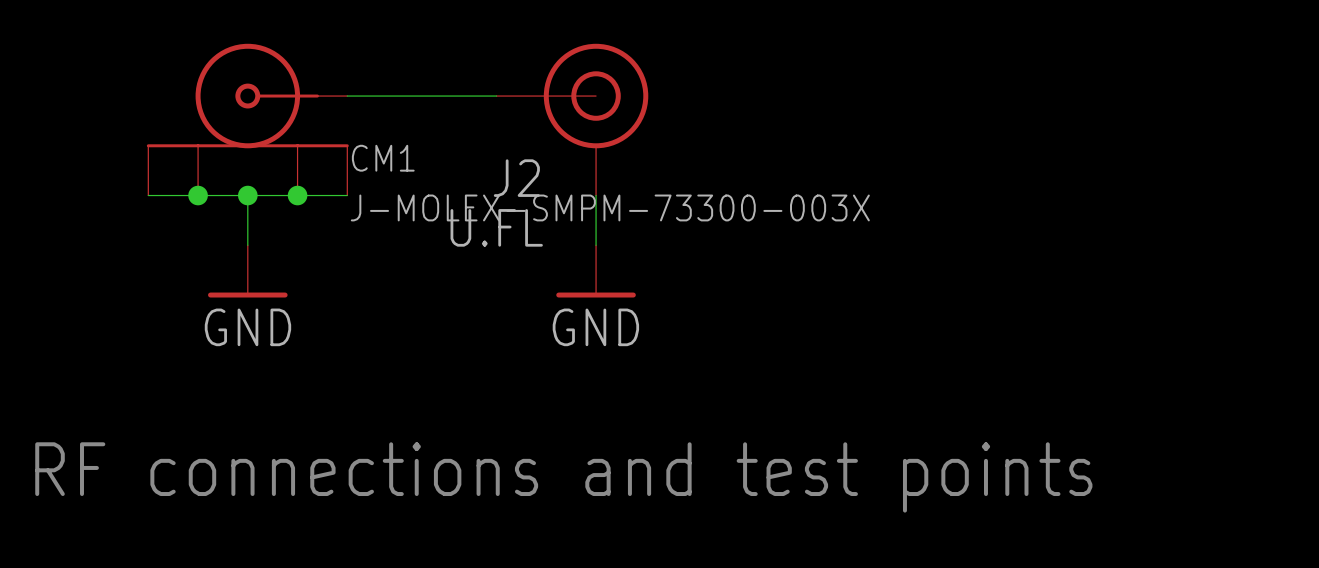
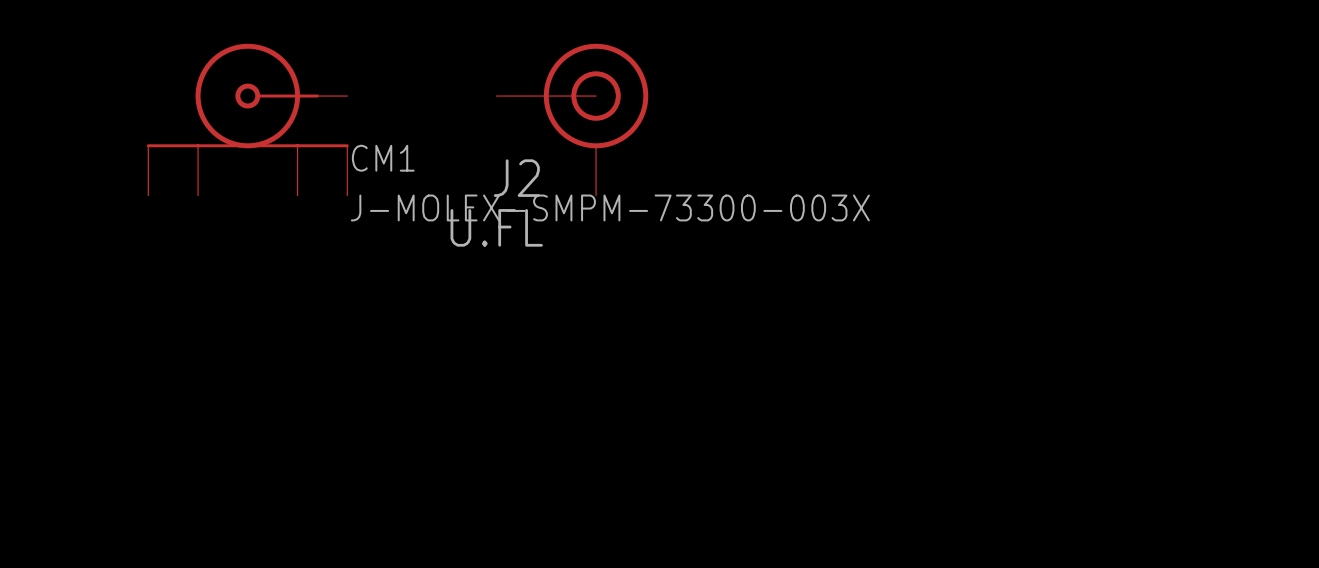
wire: (347, 96) (496, 96) -> none
wire: (148, 195) (347, 195) -> none
junction: (198, 195) -> none
wire: (247, 195) (247, 245) -> none
junction: (247, 195) -> none
junction: (297, 195) -> none
wire: (596, 195) (596, 245) -> none
power symbol: GND (247, 271) -> none
power symbol: GND (596, 271) -> none
text: RF connections and test points (563, 477) -> none

